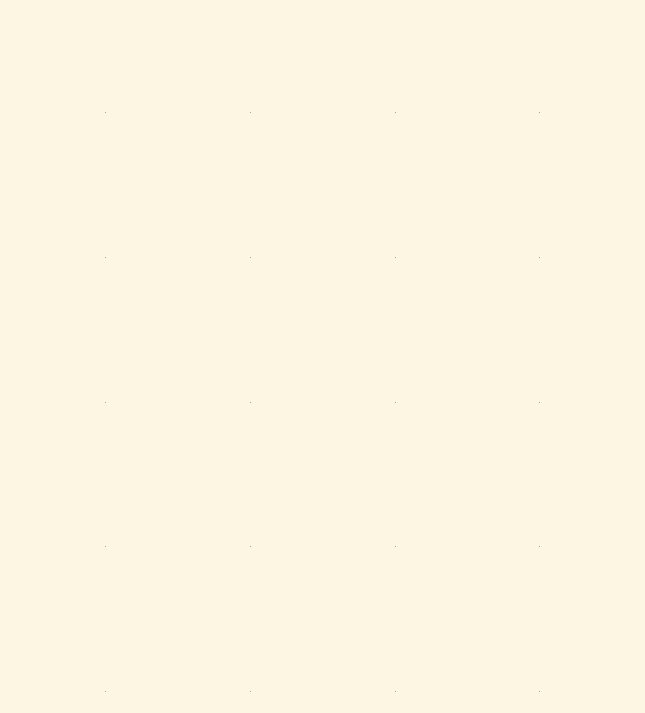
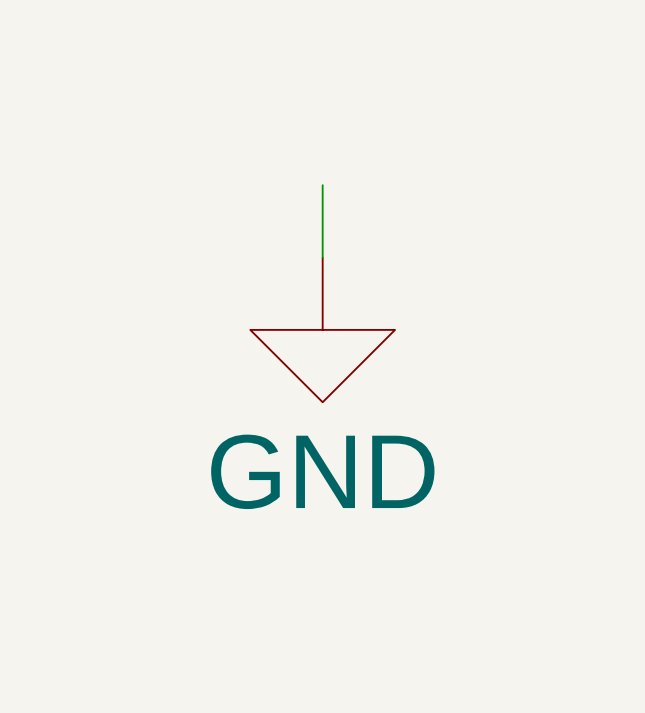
wire: none -> (322, 185) (322, 257)
power symbol: none -> GND (322, 329)

